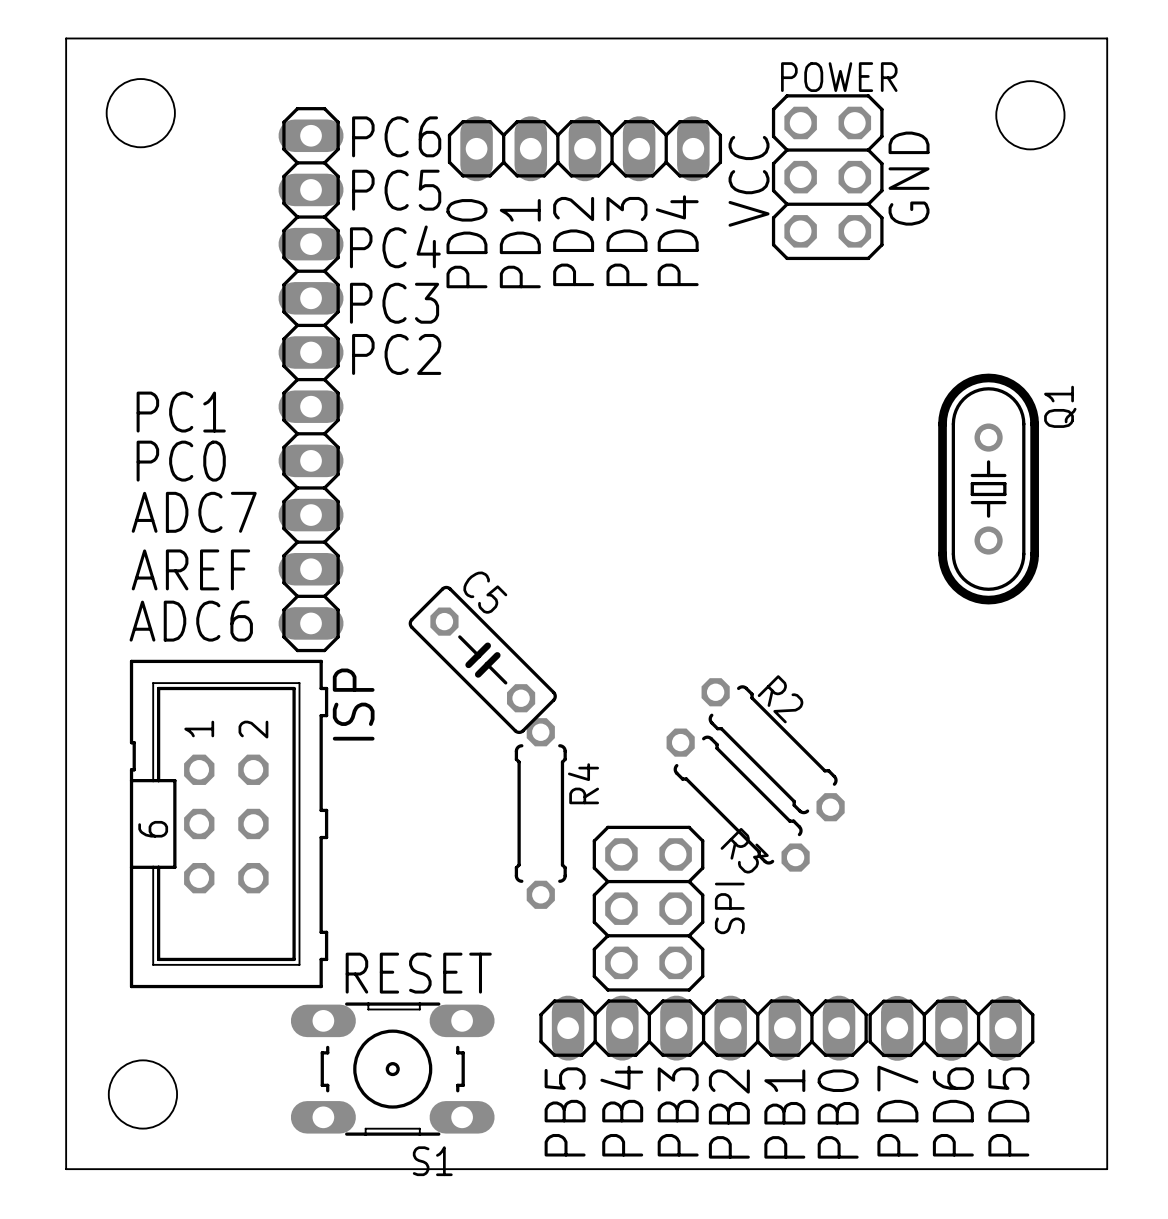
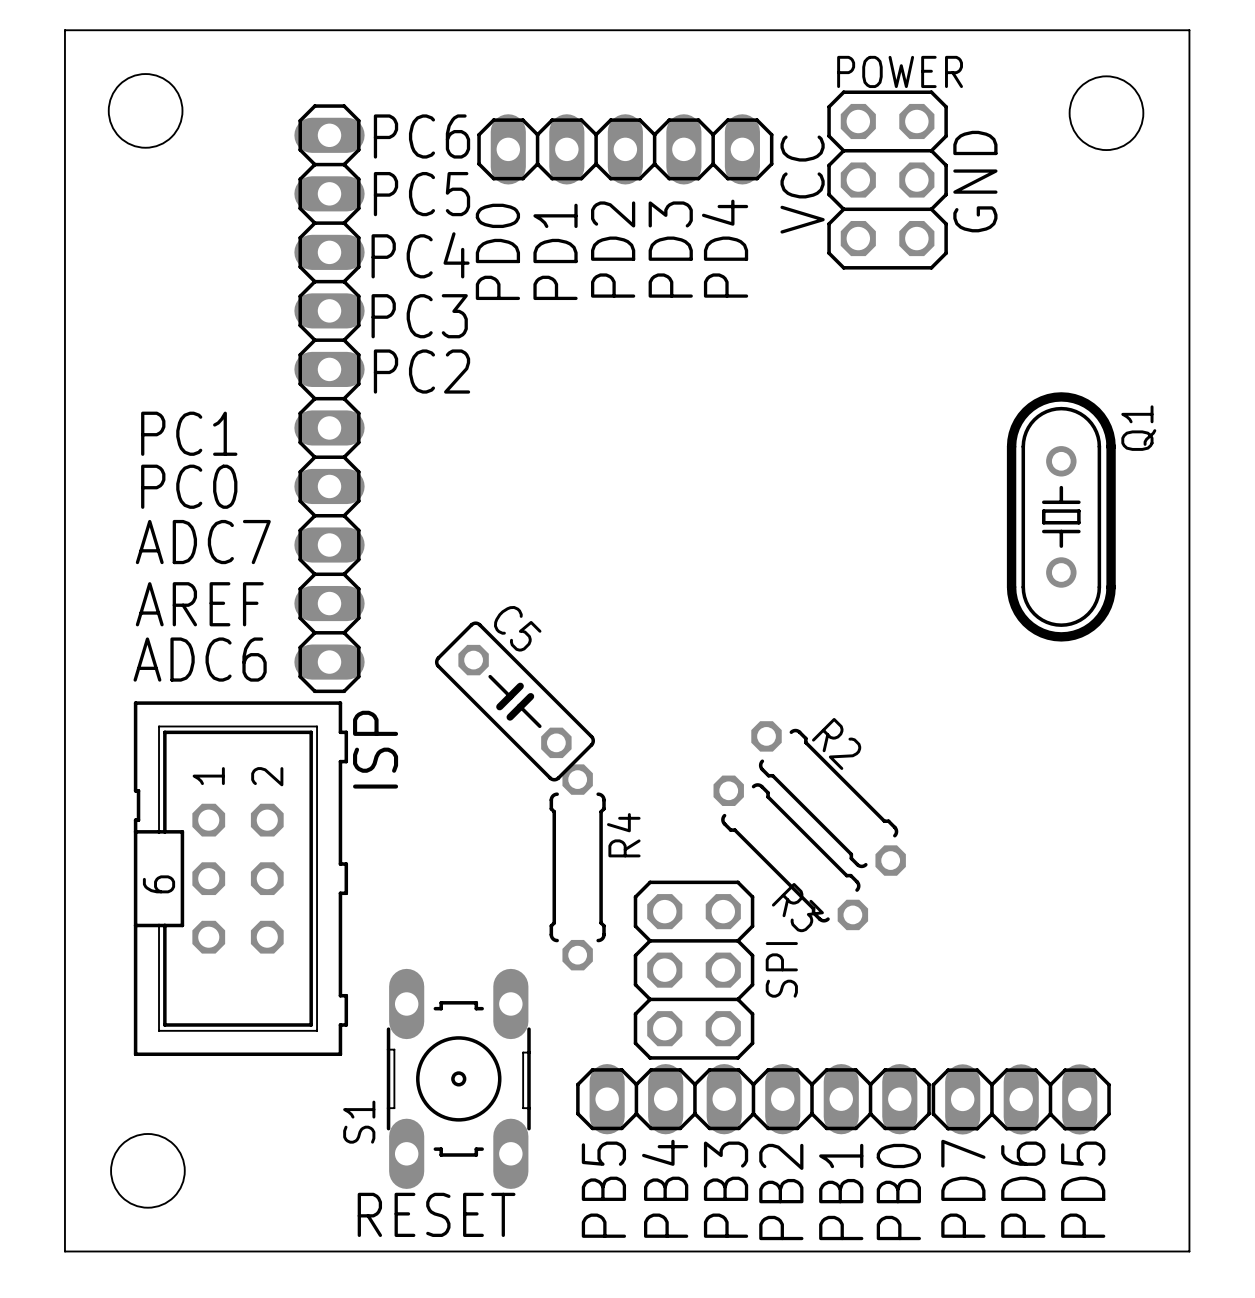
text position: RESET (418, 973) -> RESET (436, 1214)
S1 rotation: 0° (392, 1069) -> 90° clockwise (458, 1078)

